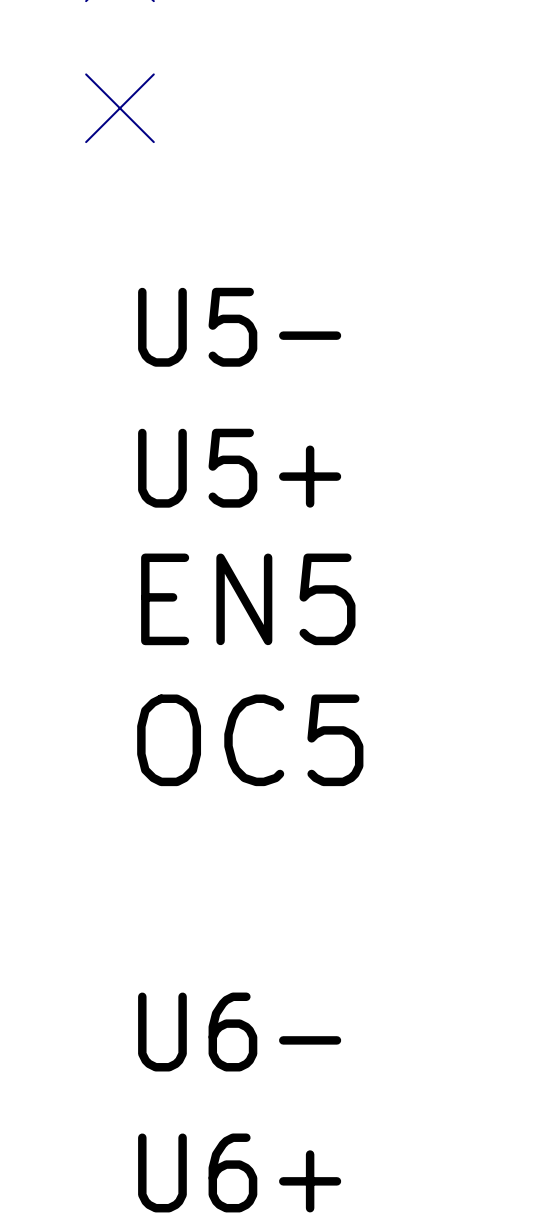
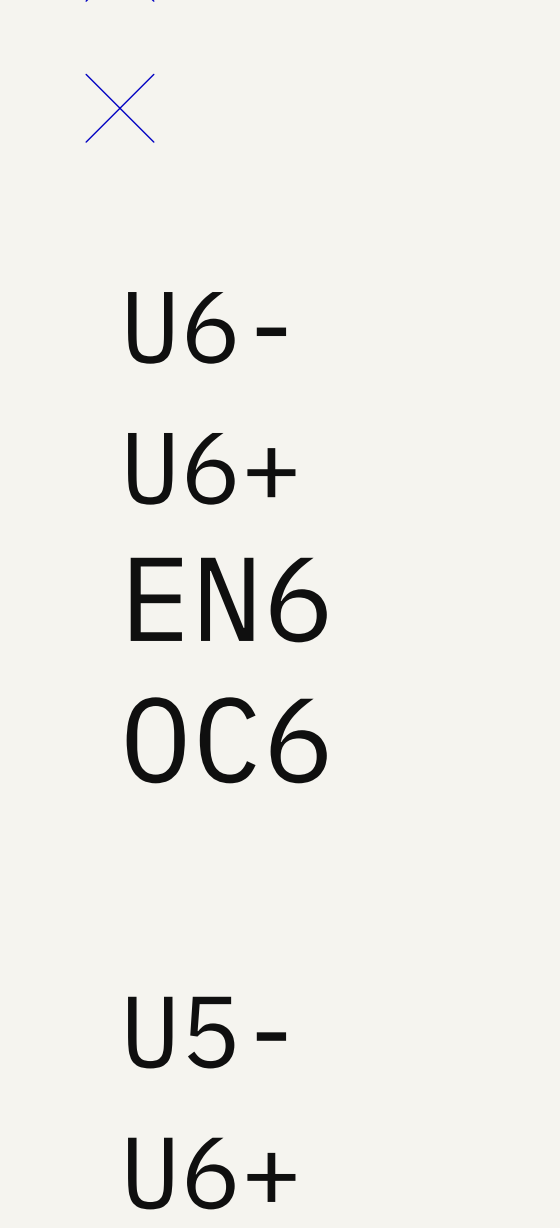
label: U5- (239, 327) -> U6- (207, 327)
label: U5+ (239, 468) -> U6+ (211, 468)
label: EN5 (248, 599) -> EN6 (228, 600)
label: OC5 (250, 740) -> OC6 (226, 740)
label: U6- (239, 1032) -> U5- (207, 1032)

